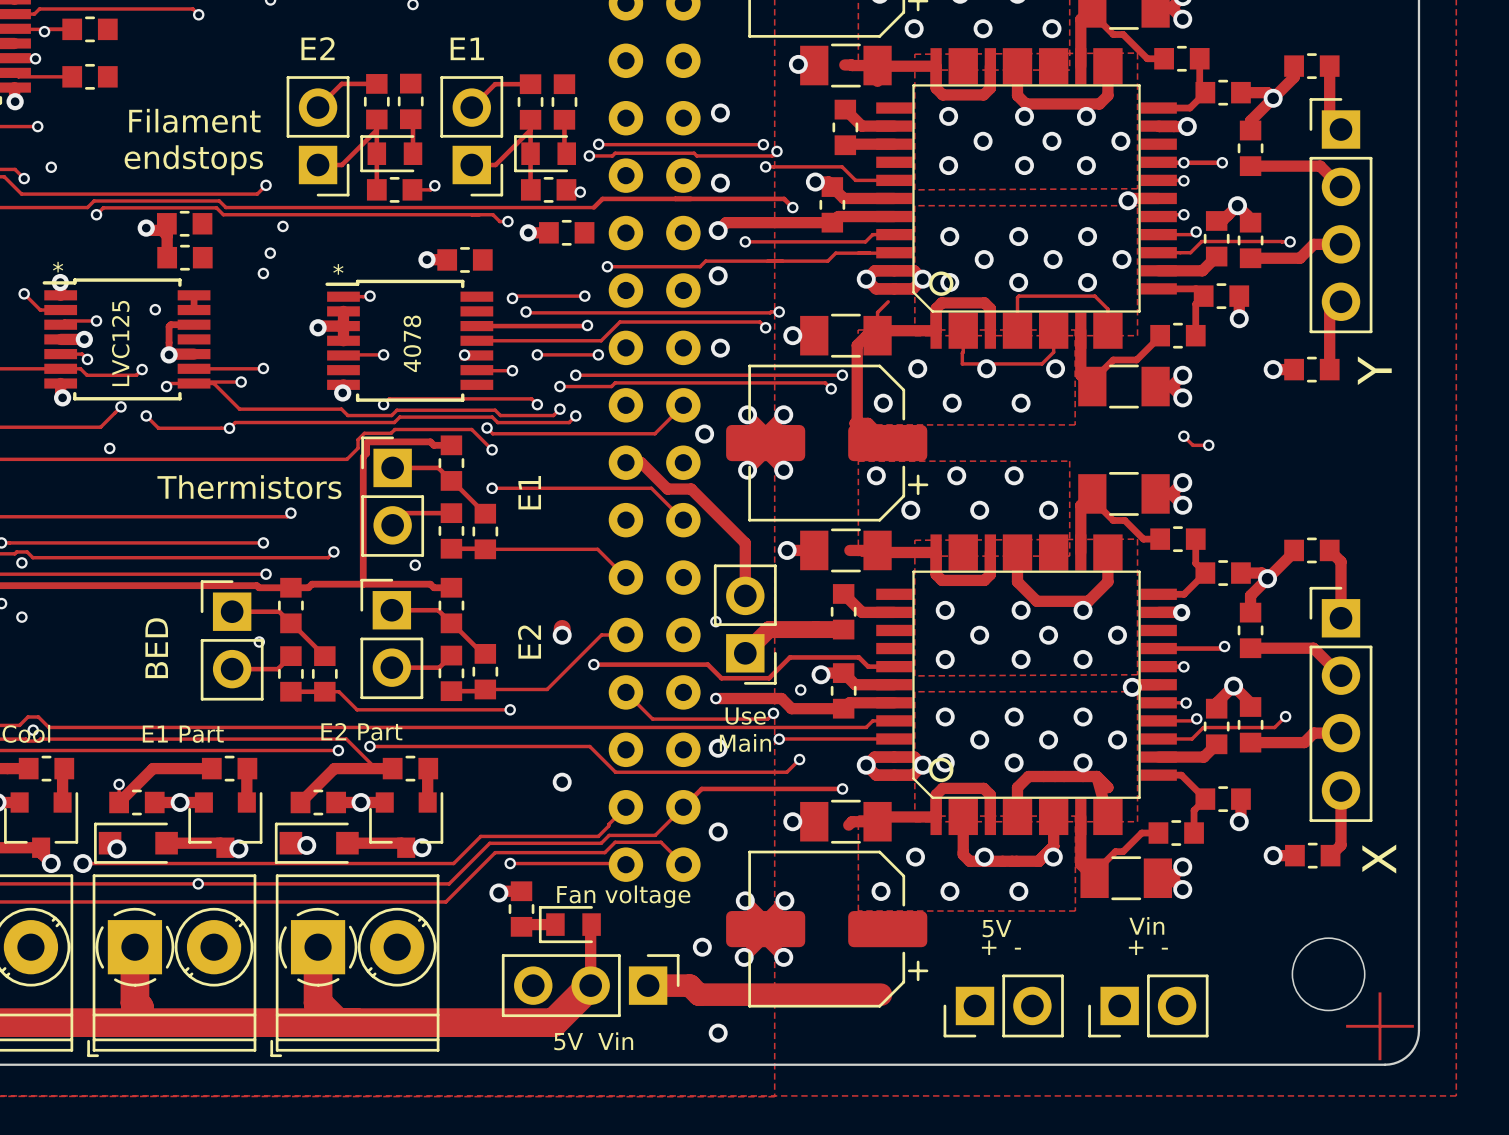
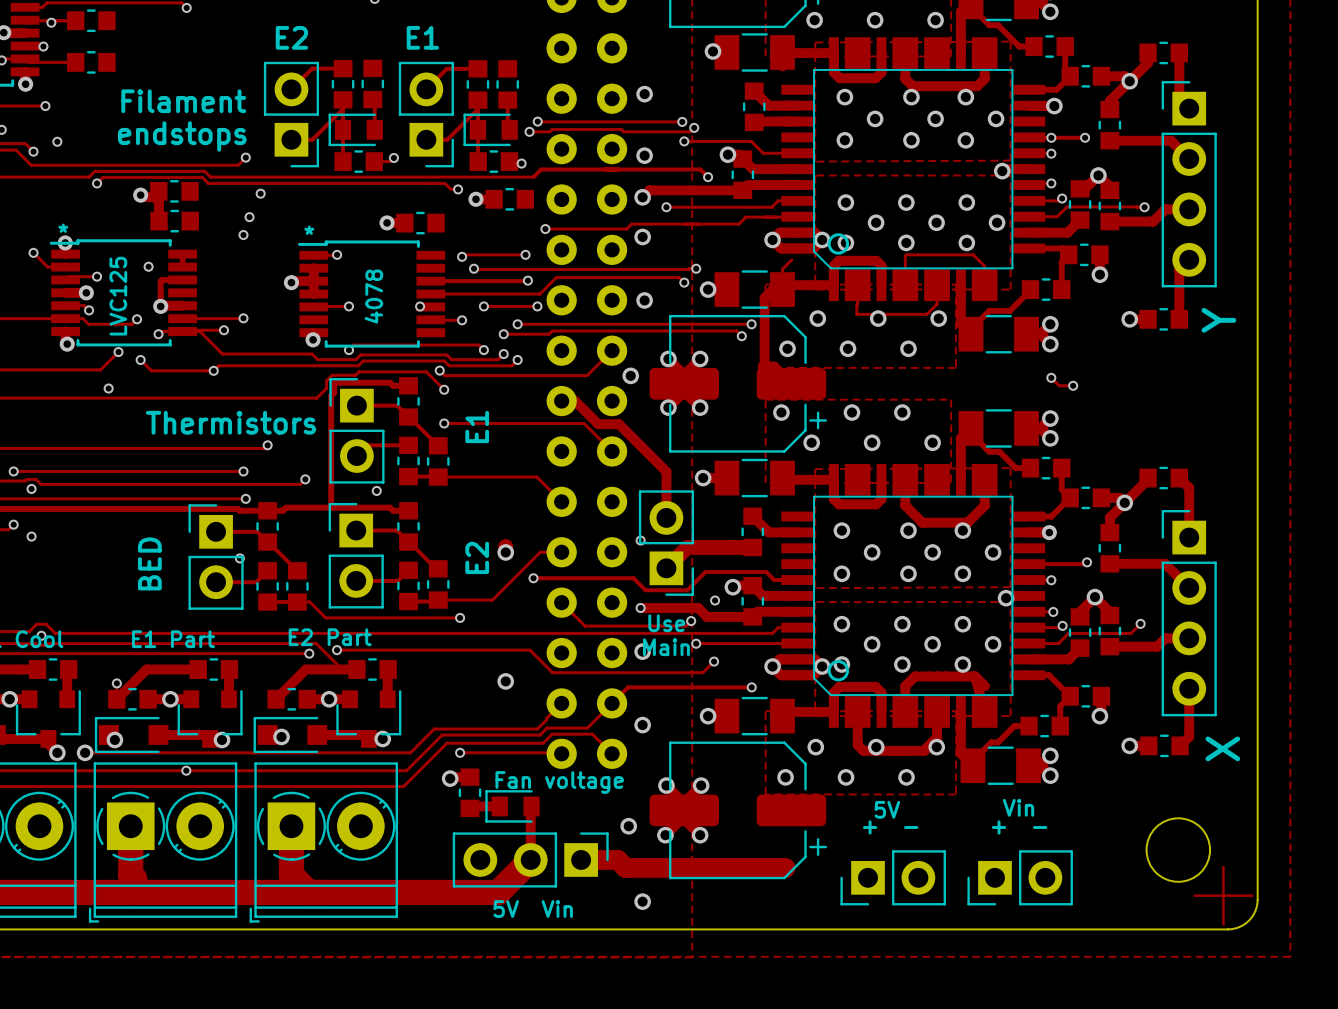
track: (844, 64) (877, 65) -> none
track: (849, 550) (877, 550) -> none
track: (877, 821) (852, 821) (848, 825) -> none

